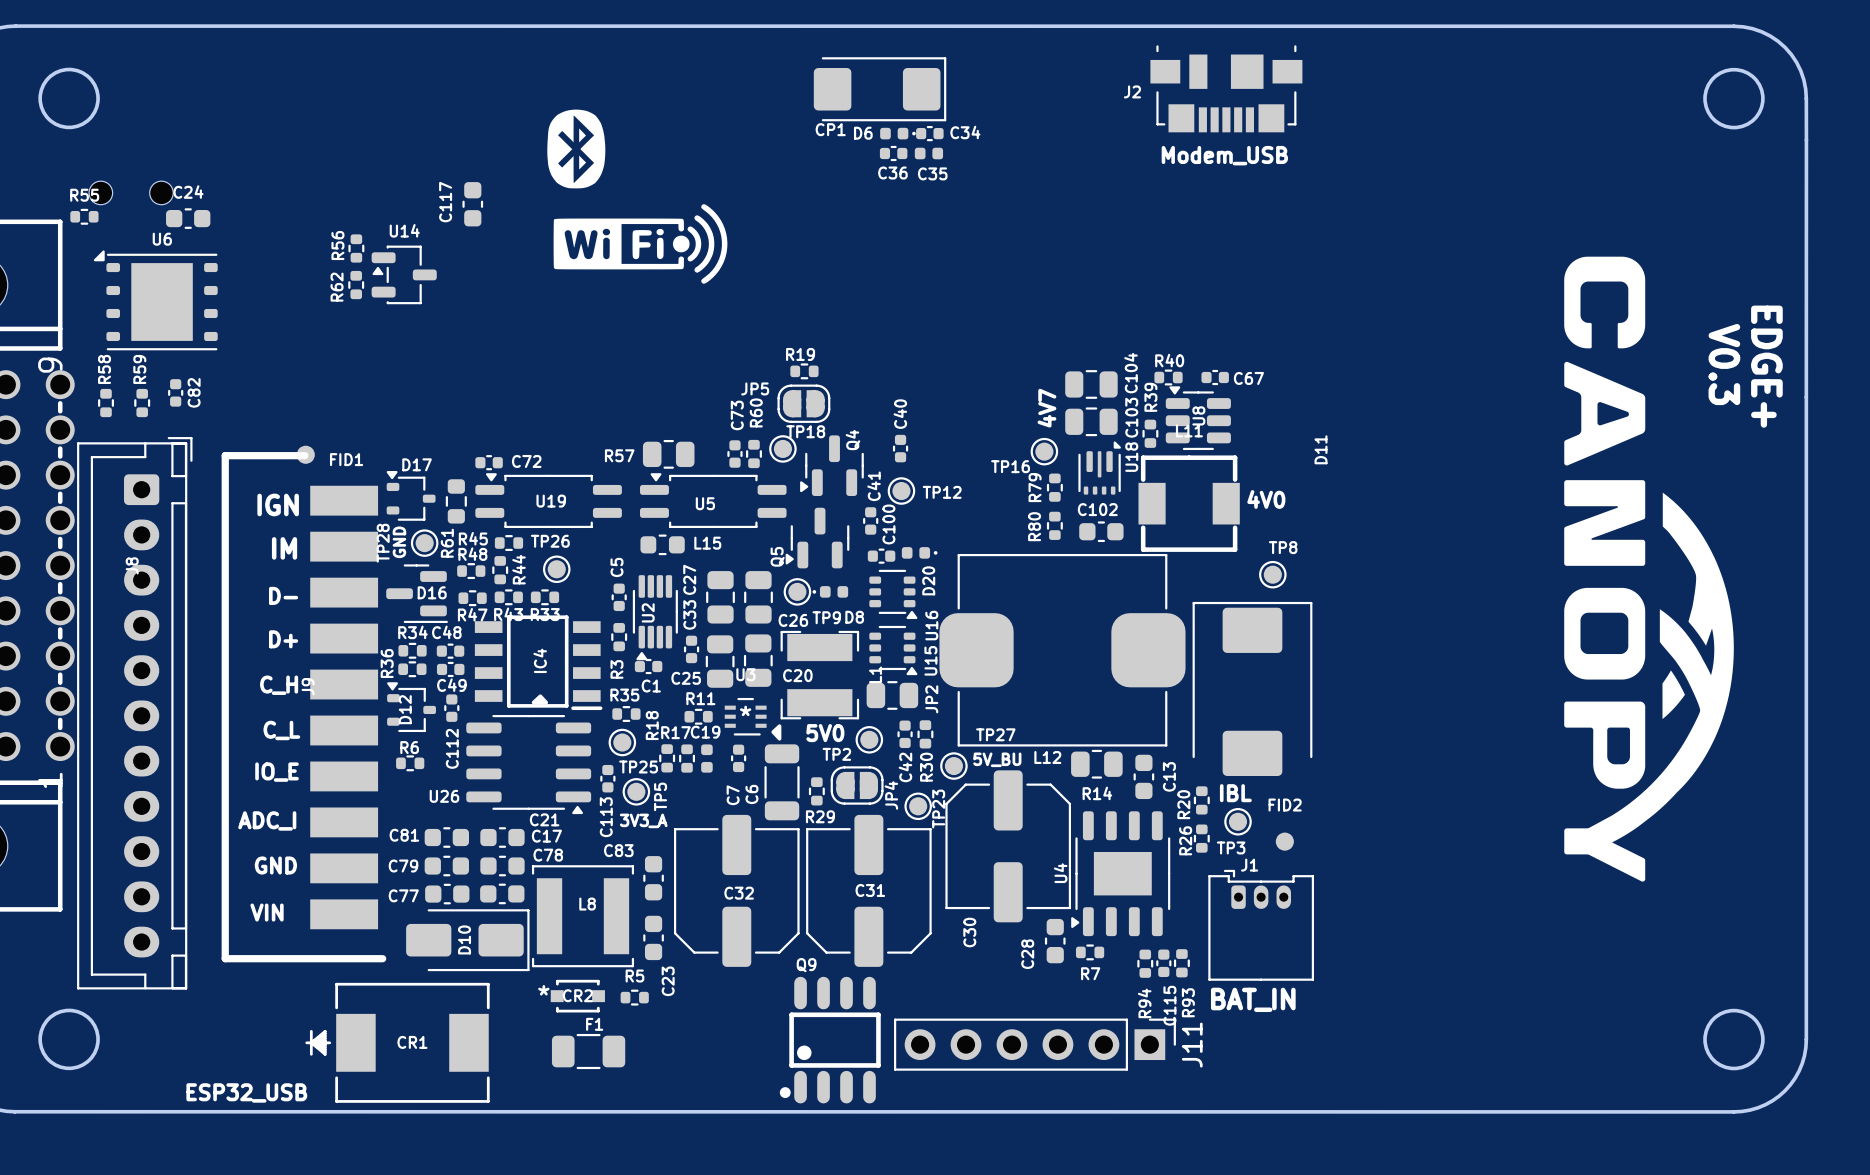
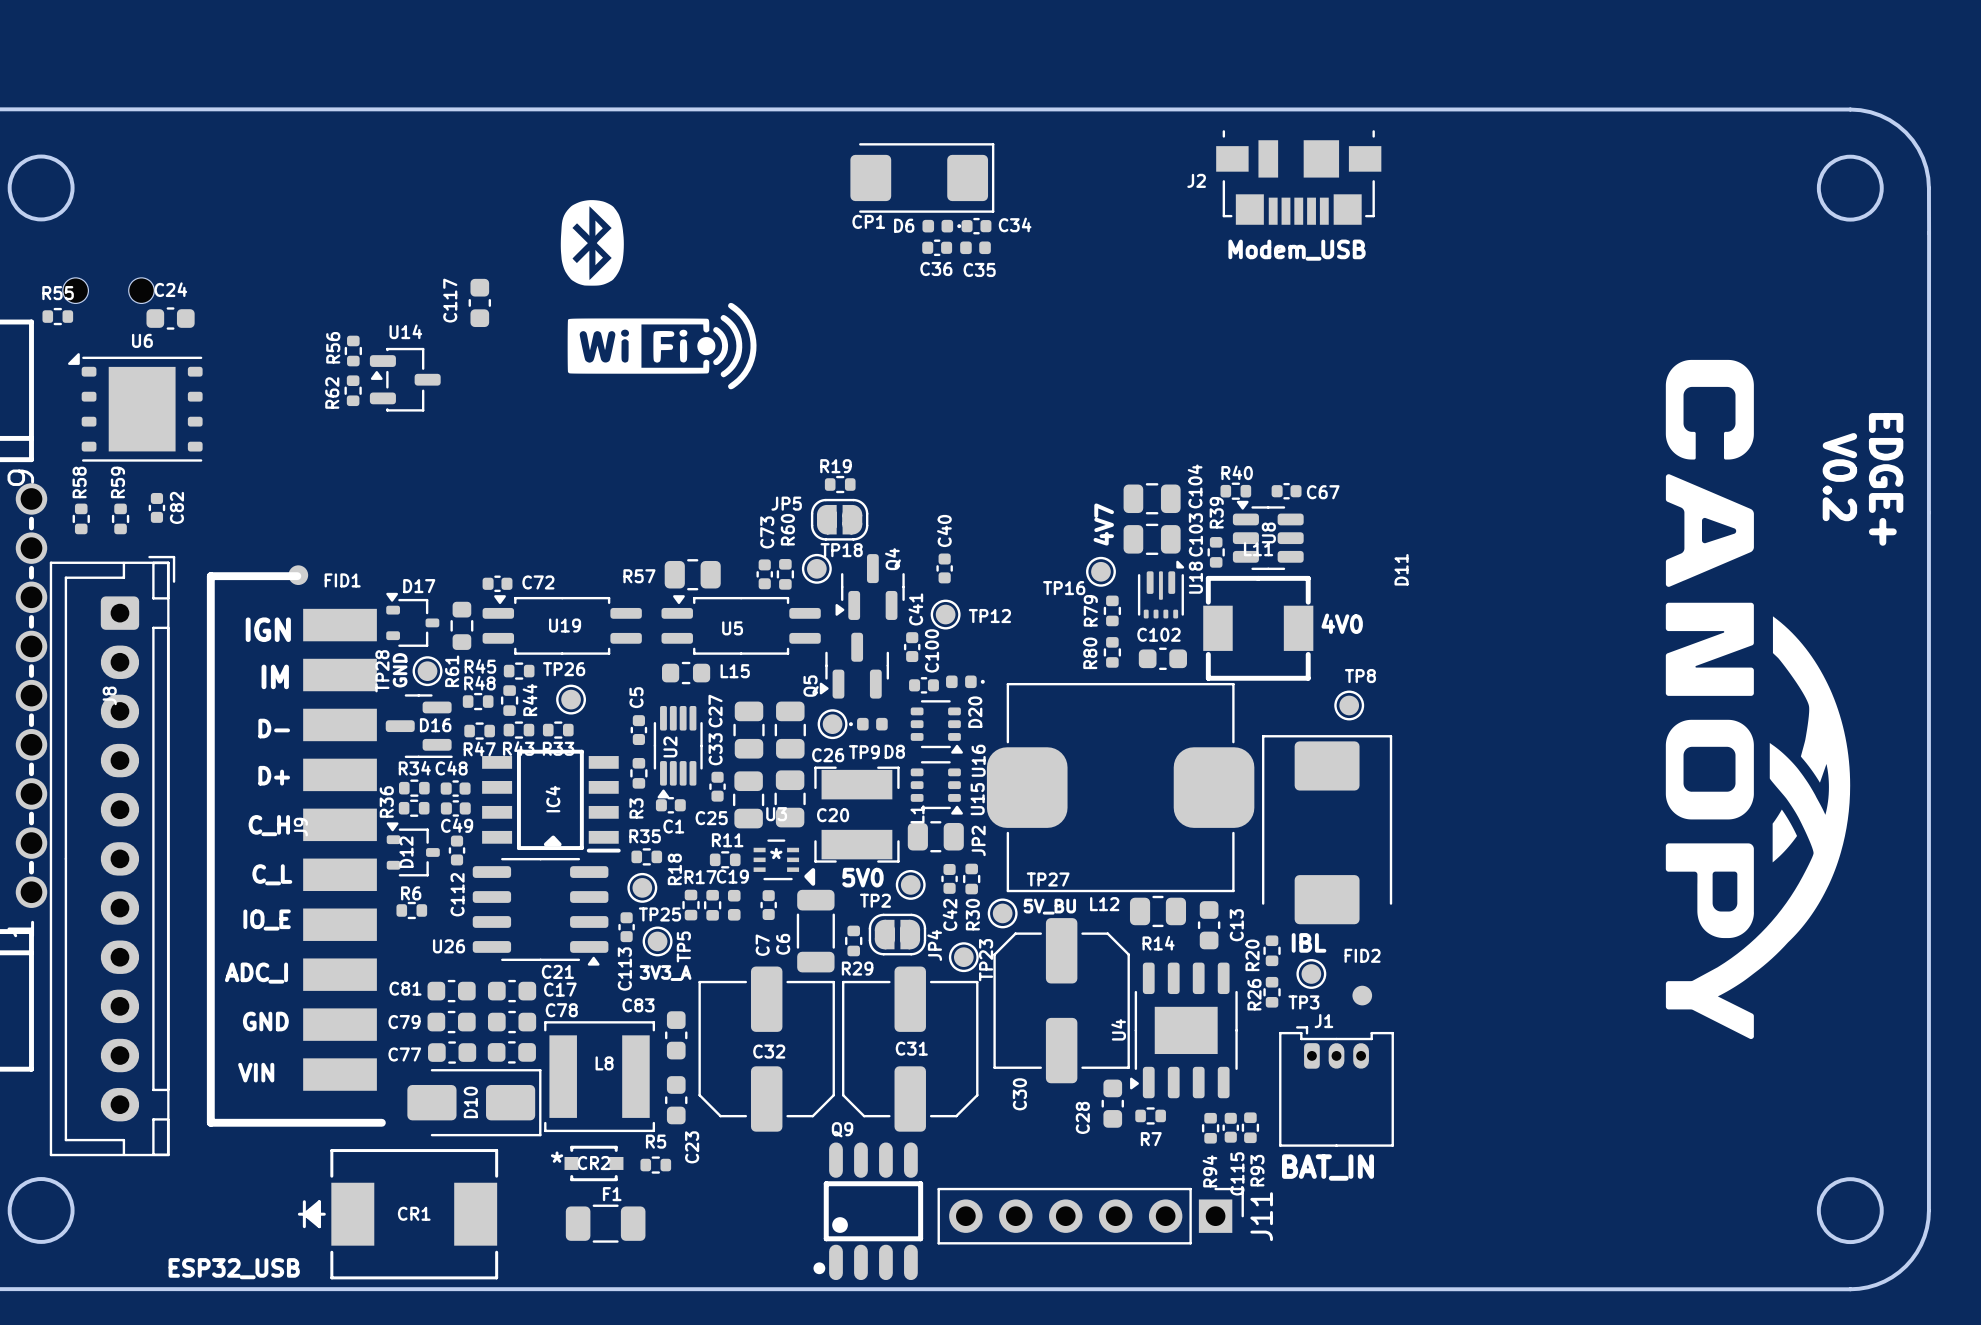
text: V0.3 (1724, 364) -> V0.2 (1839, 477)

